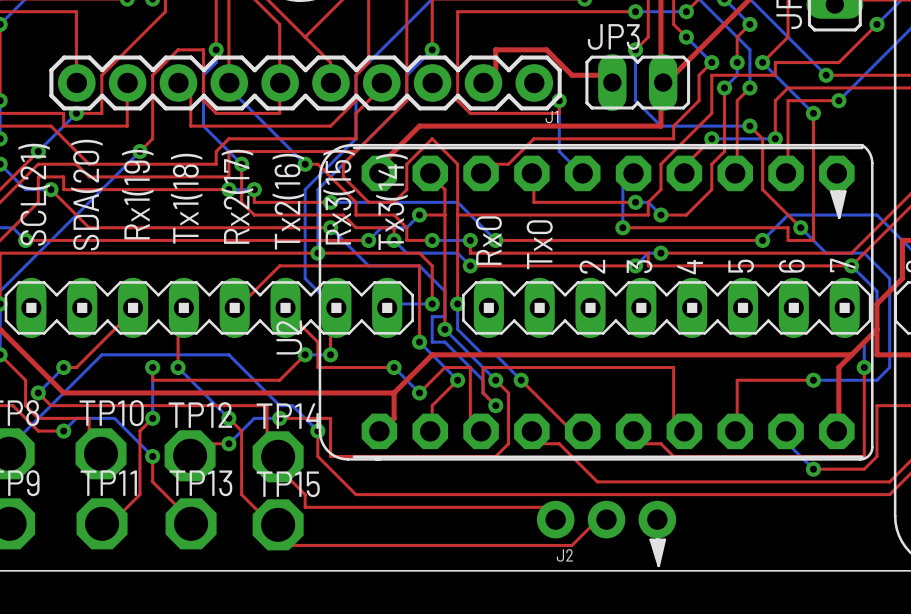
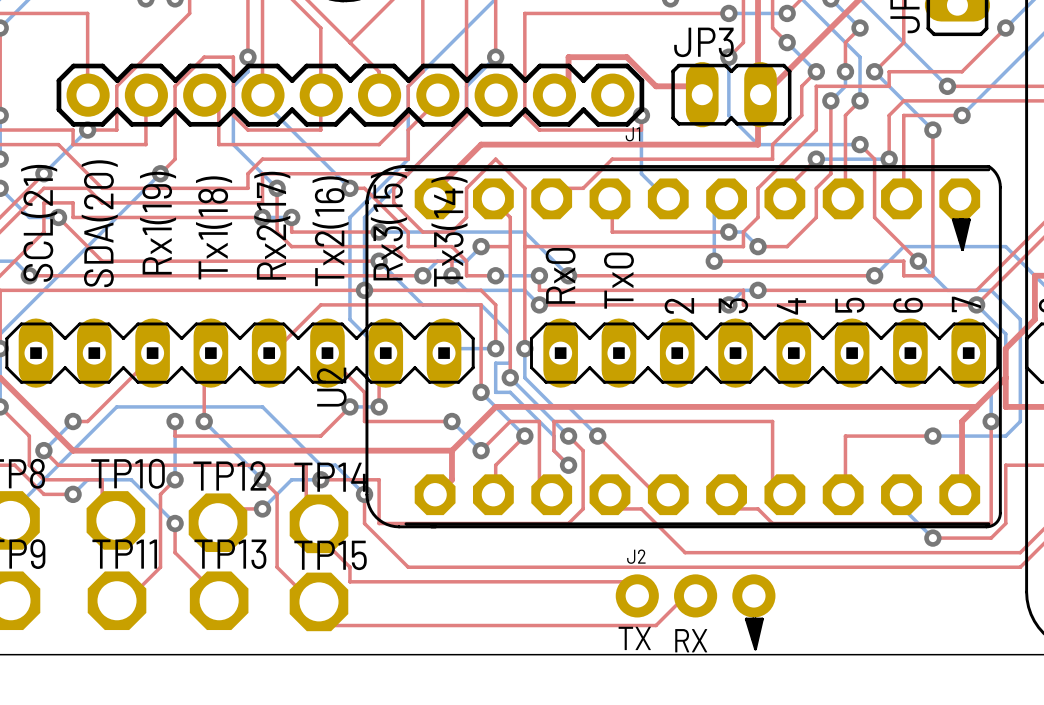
J2 name position: J2 (564, 555) -> J2 (636, 556)
text: none -> TX (634, 638)
text: none -> RX (691, 640)

